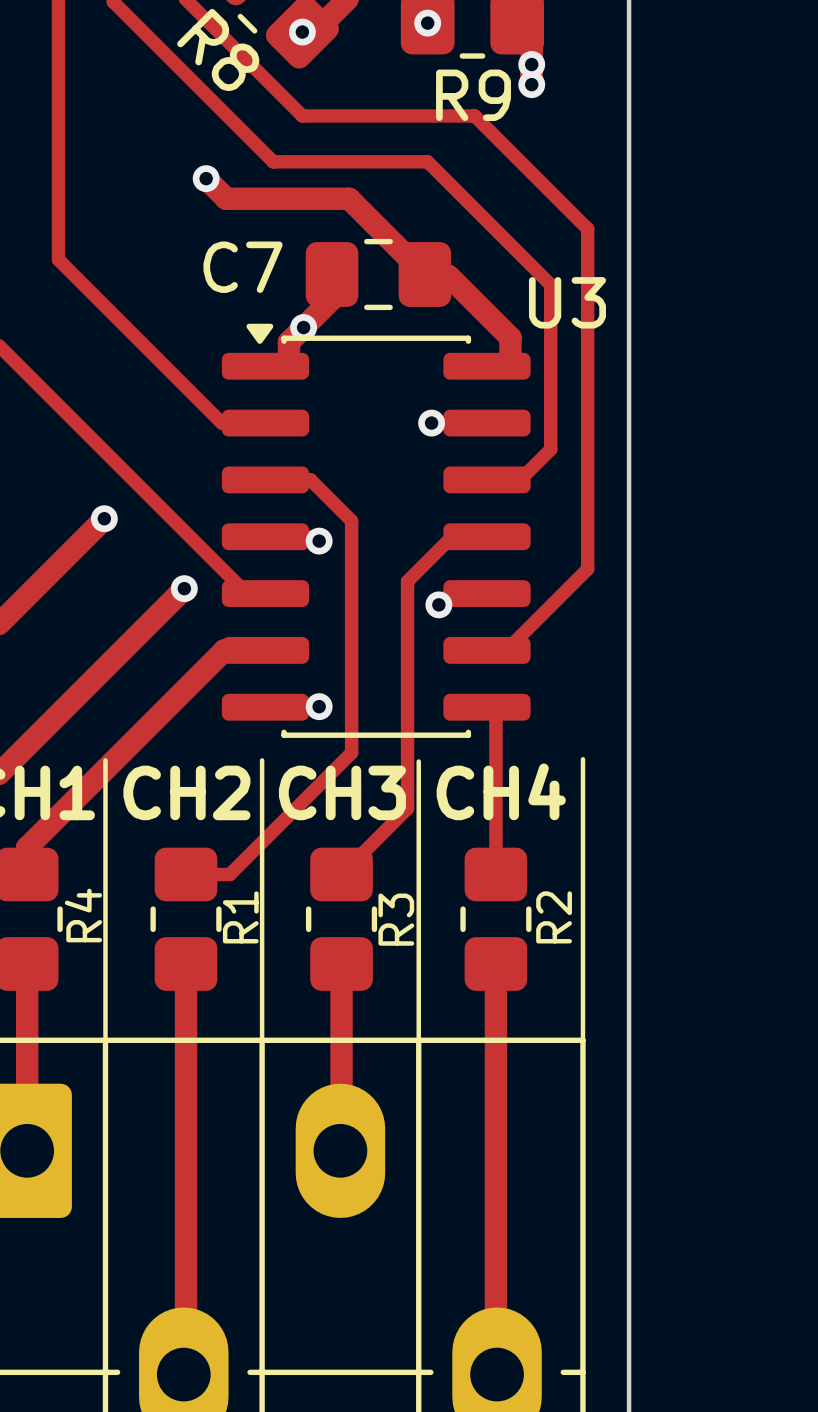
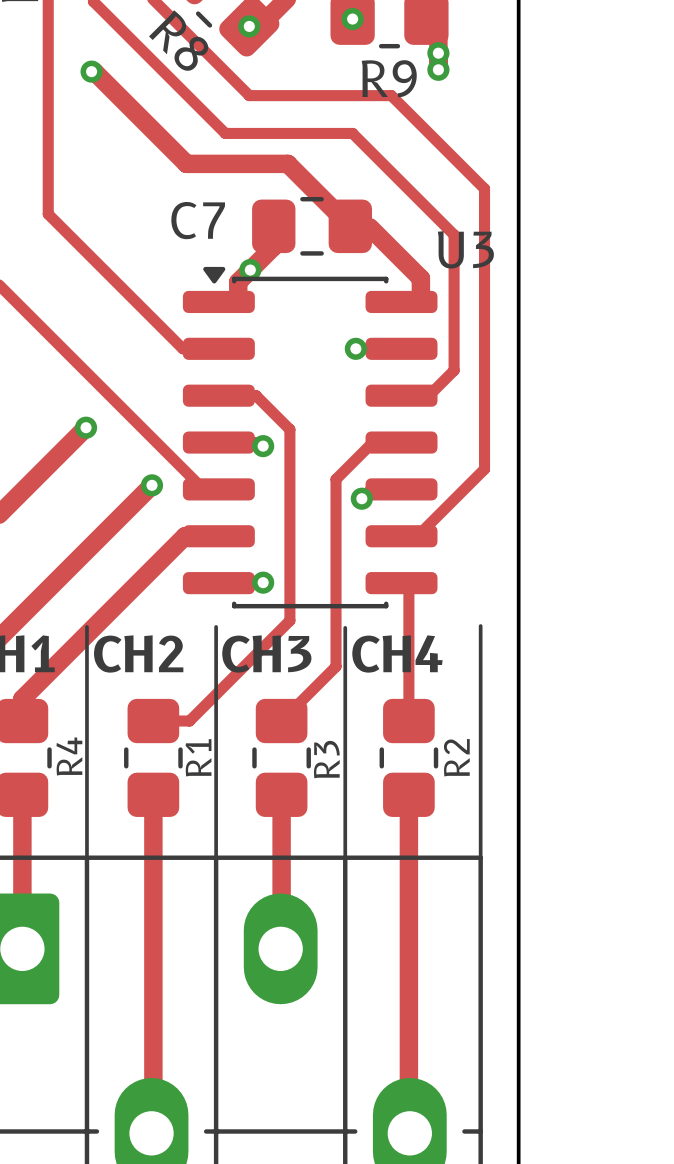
track: none -> (91, 71) (94, 71) (169, 147)
via: none -> (91, 71)
via: (206, 178) -> none

